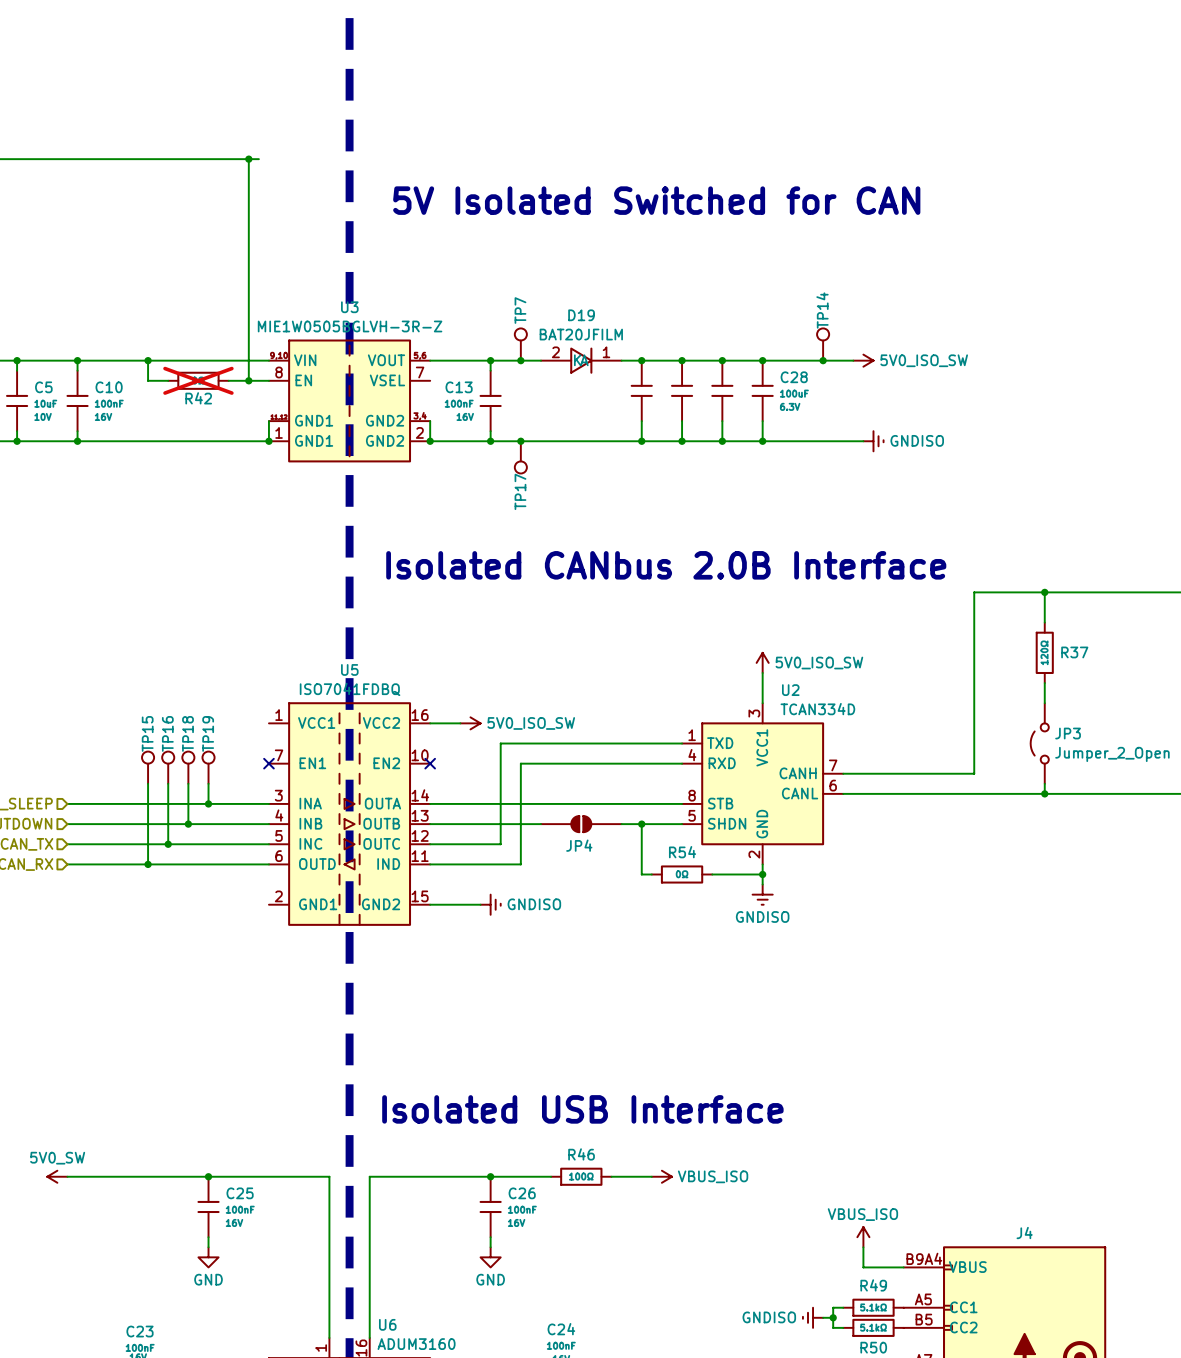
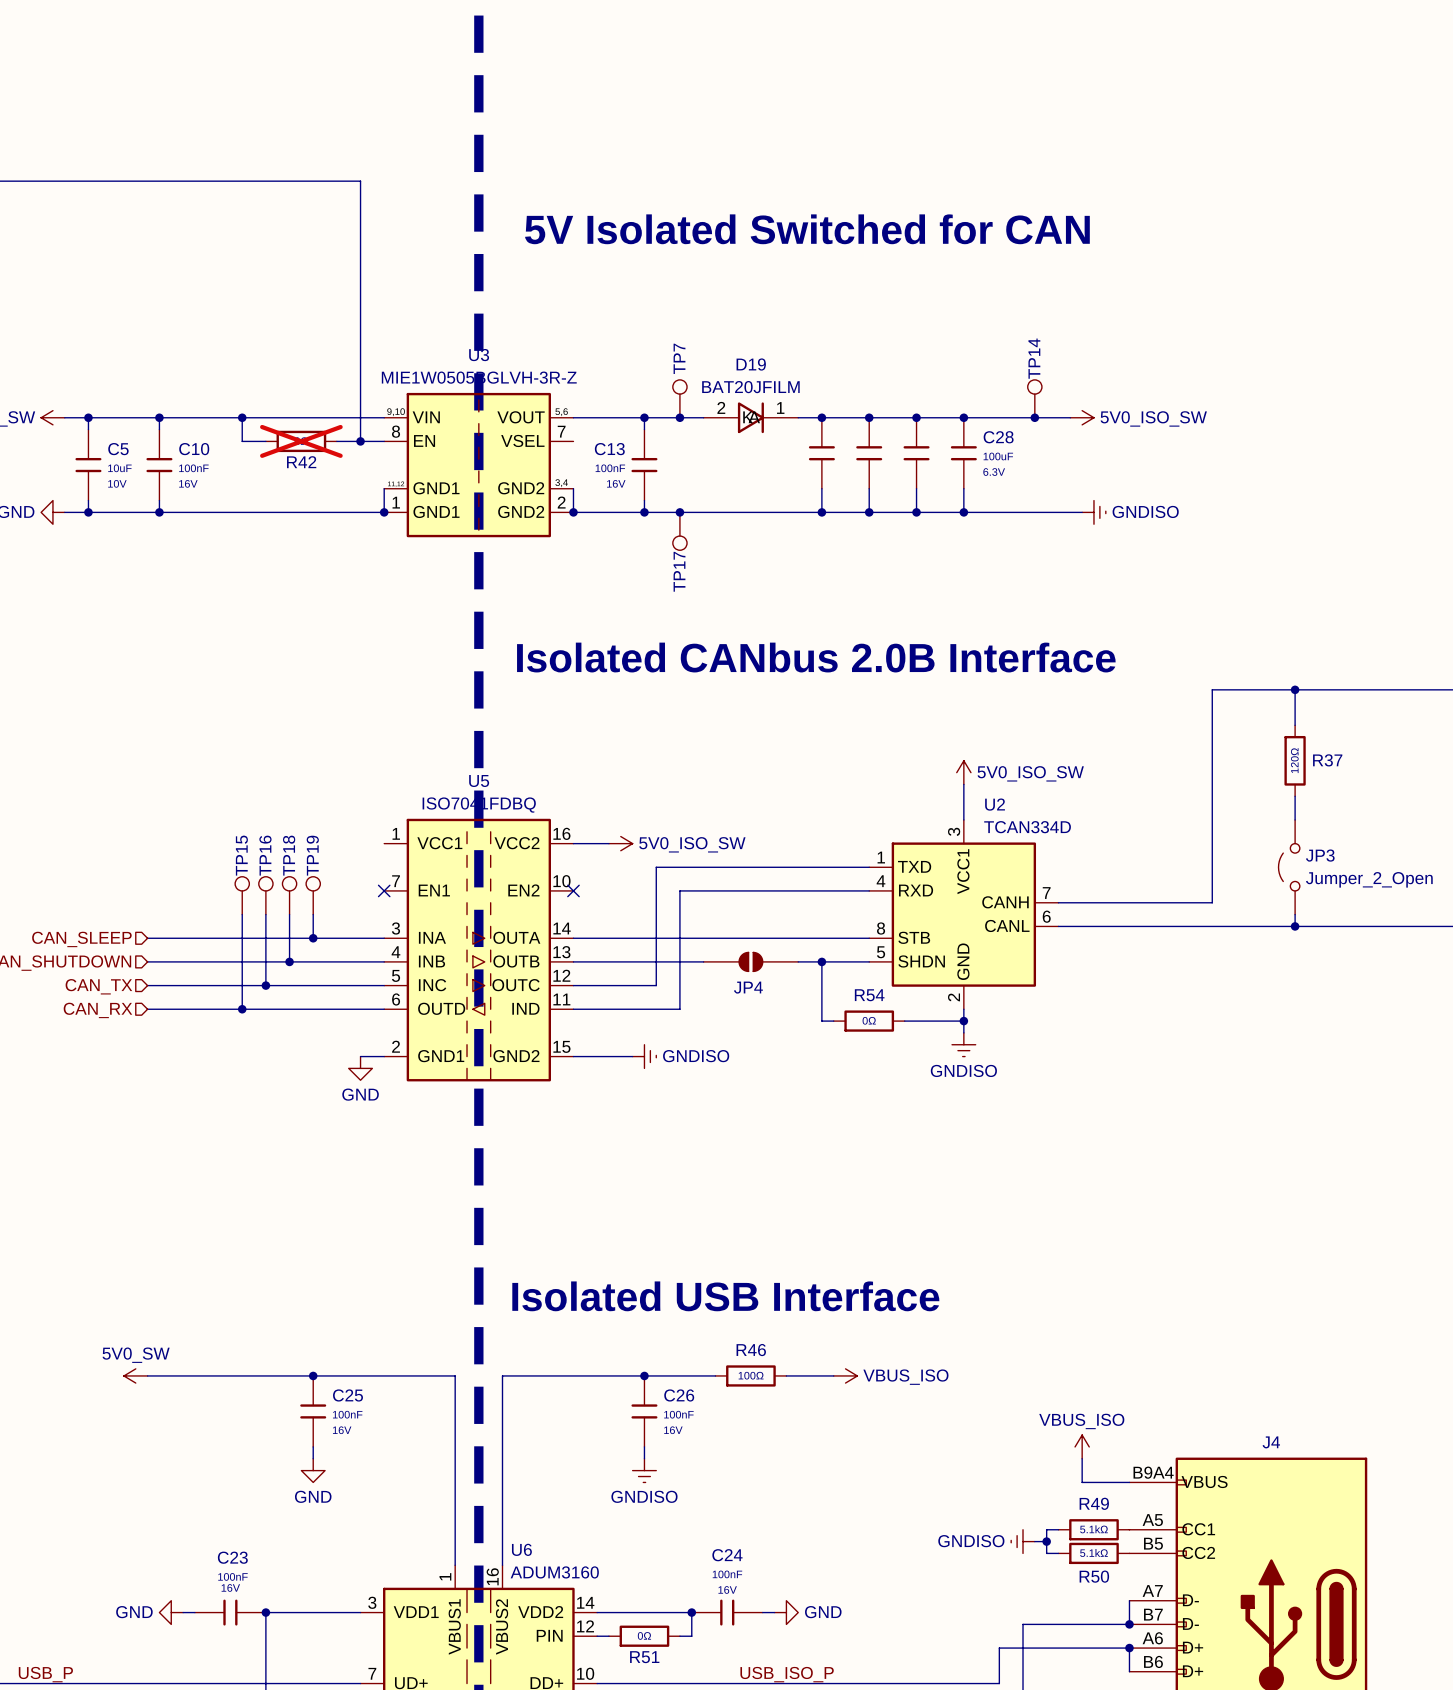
wire: (248, 159) (258, 159) -> none
junction: (248, 159) -> none
wire: none -> (360, 1056) (384, 1056)
power symbol: none -> GND (360, 1068)
power symbol: GND (490, 1257) -> GNDISO (644, 1470)

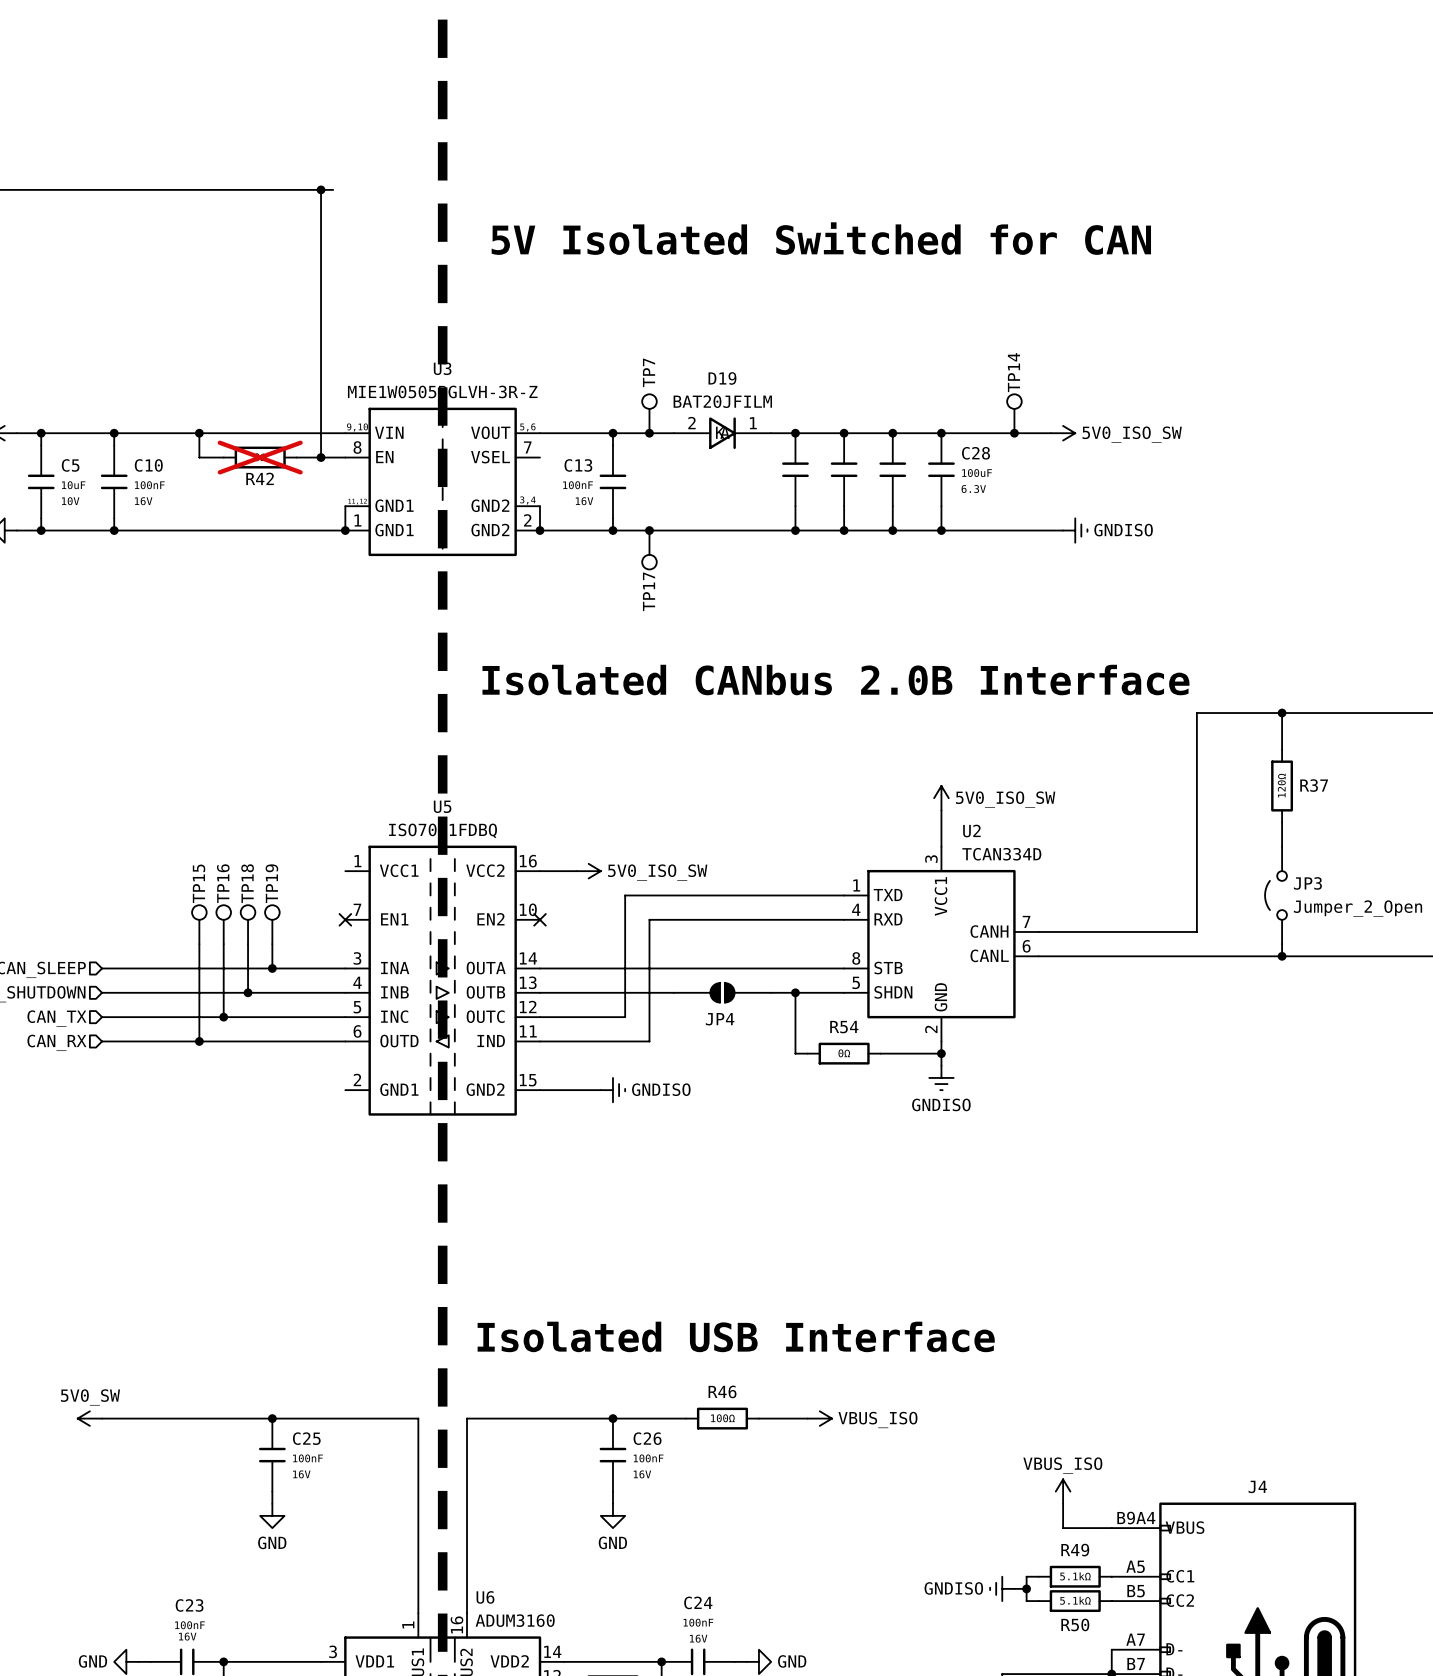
wire: none -> (321, 189) (333, 189)
junction: none -> (321, 189)
wire: (360, 1056) (384, 1056) -> none
power symbol: GND (360, 1068) -> none
power symbol: GNDISO (644, 1470) -> GND (612, 1515)

